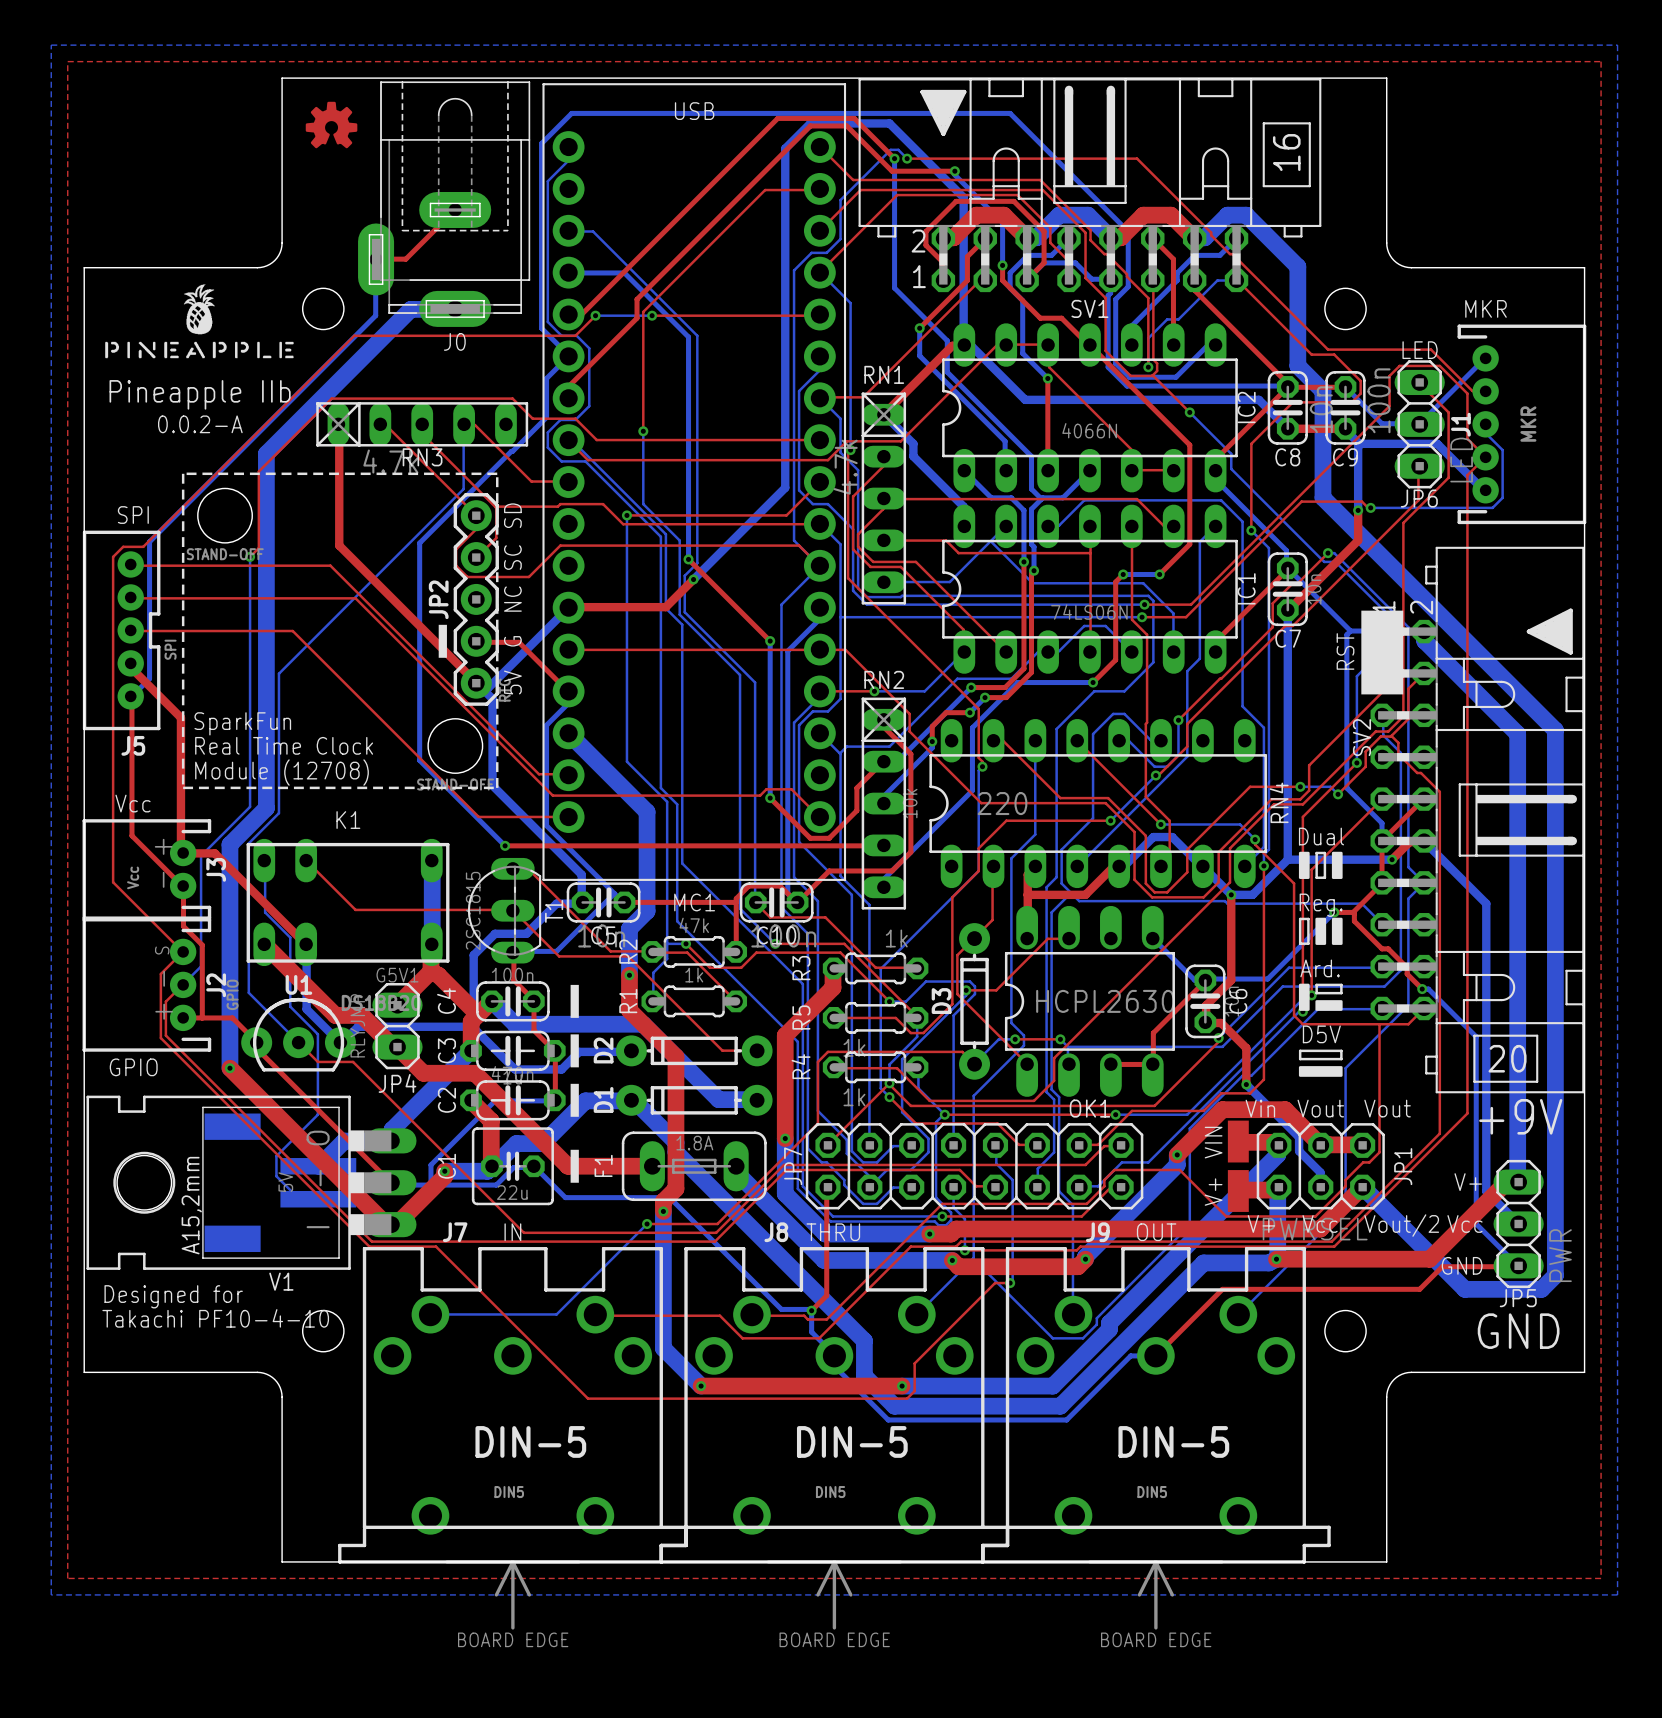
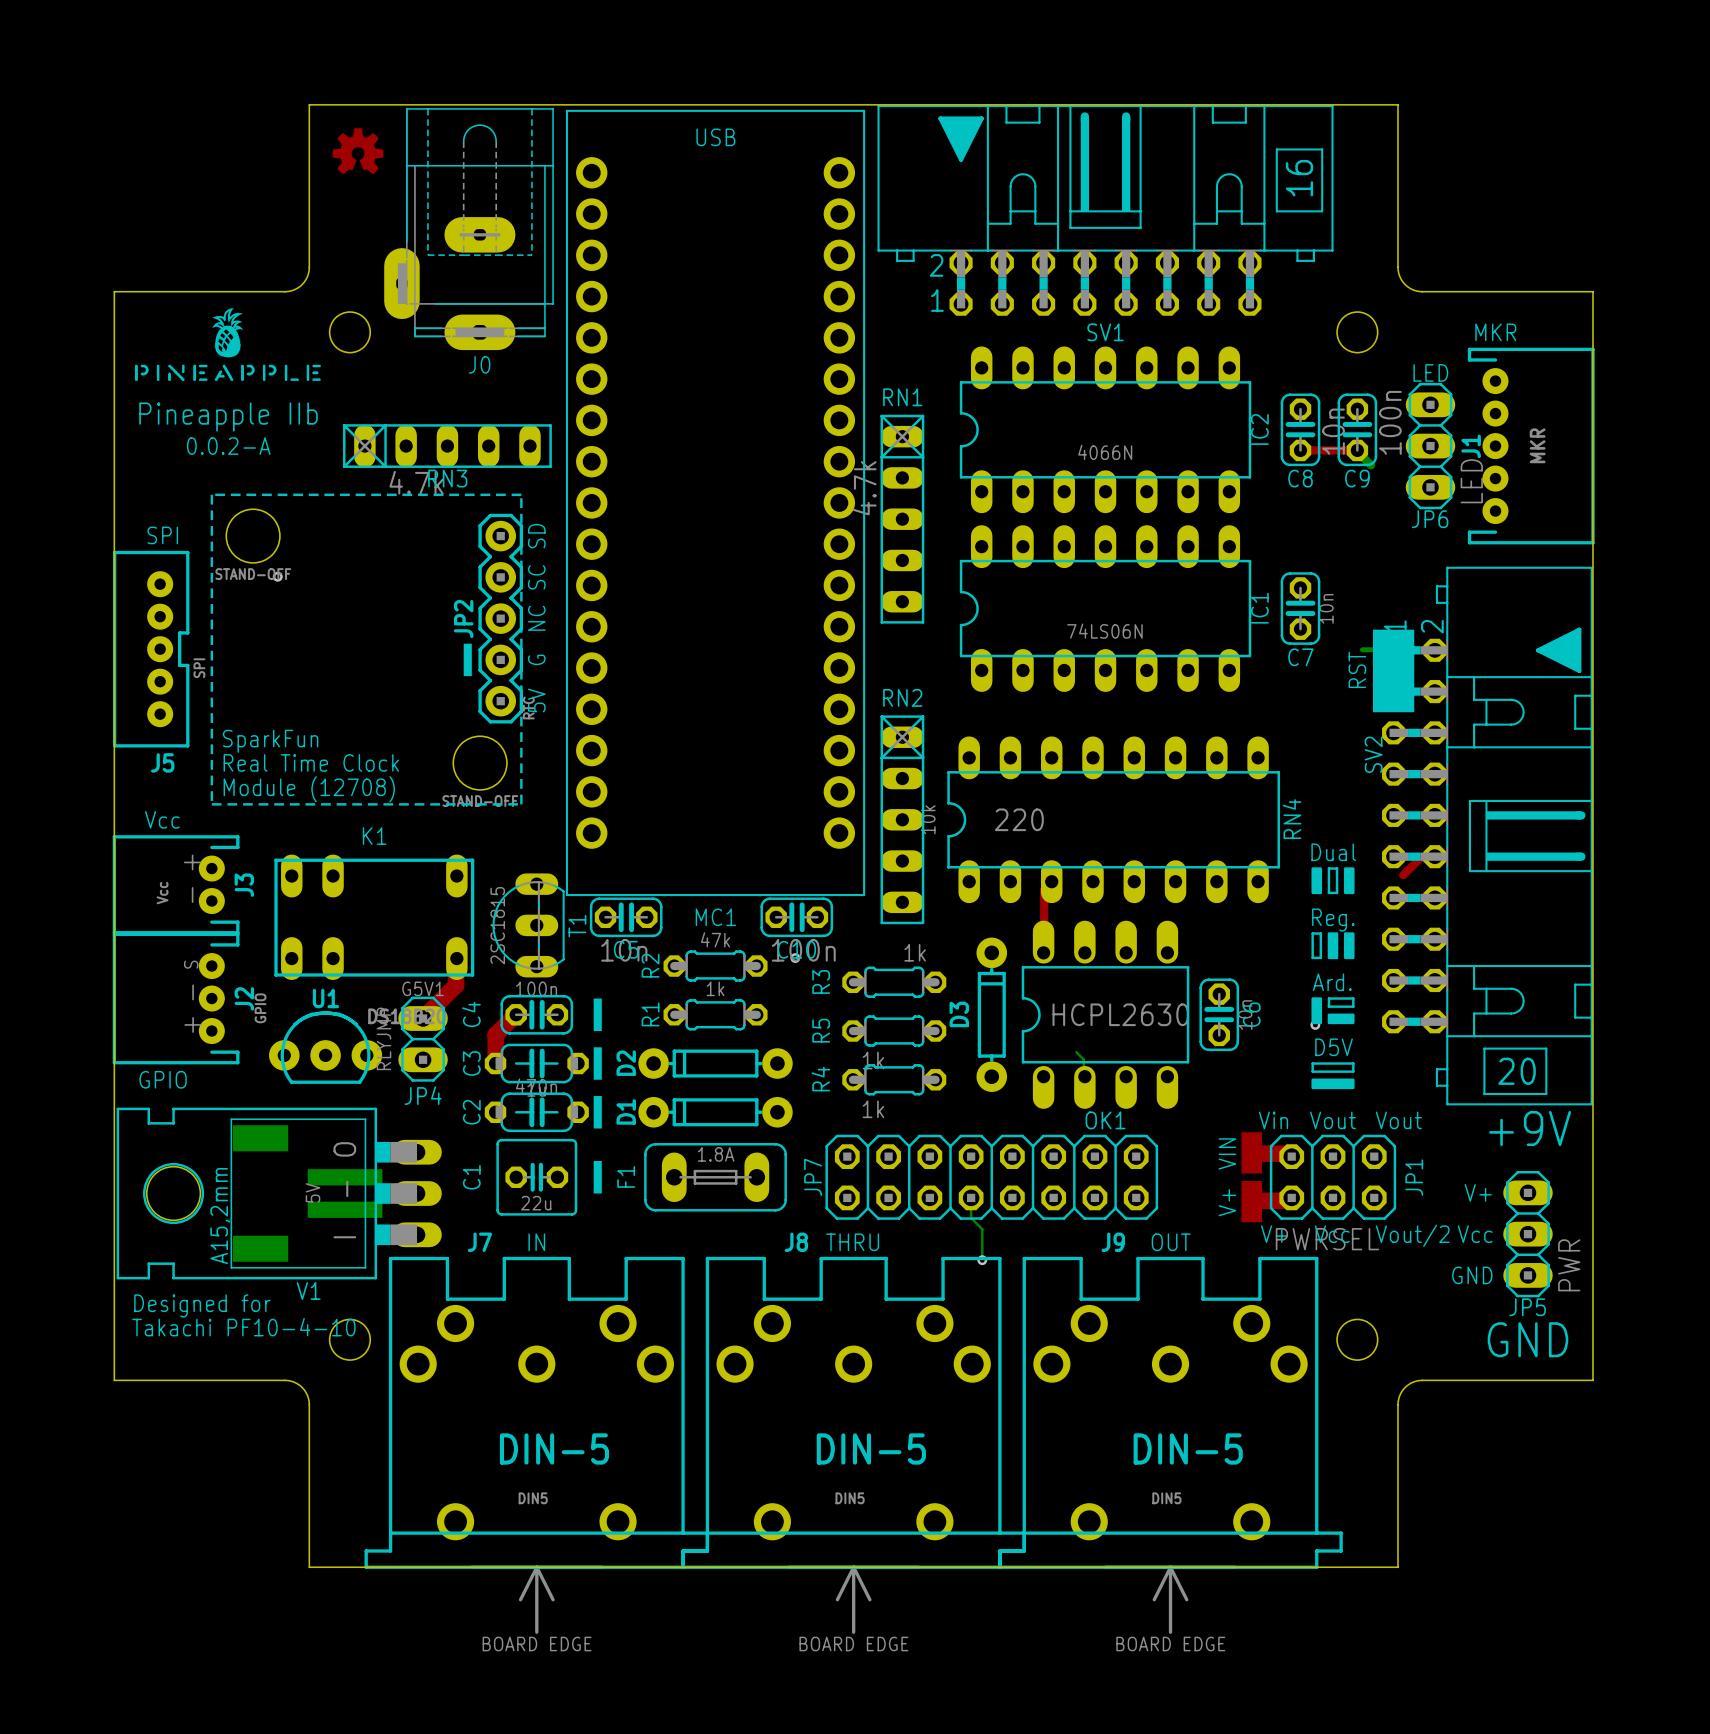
bottom zone outline: (51, 45) (51, 1594) (1617, 1594) (1617, 45) (51, 45) -> none
top zone outline: (67, 61) (67, 1578) (1601, 1578) (1601, 61) (67, 61) -> none
bottom track: (568, 147) (567, 161) (547, 181) (547, 321) (561, 335) (576, 335) (589, 348) (589, 406) (575, 419) (560, 419) (547, 432) (547, 447) (561, 461) (585, 461) (660, 536) (660, 788) (677, 804) (677, 921) (797, 1041) (797, 1188) (830, 1221) (934, 1221) (938, 1225) (946, 1225) (951, 1220) (951, 1212) (936, 1197) (936, 1122) (944, 1114) (918, 1088) (917, 1067) -> none
top track: (819, 147) (853, 180) (1040, 180) (1090, 230) (1090, 240) (1126, 274) (1126, 276) (1148, 298) (1148, 367) -> none
top track: (894, 158) (854, 118) (777, 118) (581, 314) (568, 314) -> none
bottom track: (894, 158) (894, 288) (947, 340) (947, 372) (1031, 456) (1031, 489) (1041, 499) -> none
via: (894, 158) -> none
top track: (907, 158) (1137, 158) (1211, 232) (1211, 235) (1327, 349) (1431, 349) (1472, 391) (1485, 391) -> none
bottom track: (907, 158) (898, 149) (890, 149) (840, 200) (840, 239) (826, 252) (811, 252) (794, 270) (794, 540) (819, 565) (781, 604) (781, 907) (807, 933) (807, 1148) (821, 1162) (826, 1162) (844, 1180) (844, 1185) (863, 1203) (876, 1203) (893, 1187) (911, 1187) -> none
via: (907, 158) -> none
top track: (954, 171) (892, 171) (846, 125) (810, 125) (637, 299) (637, 318) (569, 386) (568, 398) -> none
bottom track: (954, 171) (954, 174) (1002, 222) (1002, 265) -> none
via: (954, 171) -> none
top track: (819, 188) (765, 190) (643, 311) (643, 431) -> none
top track: (455, 210) (405, 259) (376, 259) -> none
bottom track: (568, 230) (593, 231) (697, 335) (697, 563) (684, 575) (684, 612) (755, 682) (755, 902) -> none
top track: (819, 230) (860, 190) (1042, 190) (1085, 232) (1085, 277) (1105, 298) (1105, 350) (1130, 375) (1152, 375) (1157, 370) (1157, 363) (1153, 359) (1152, 280) -> none
top track: (943, 238) (953, 237) (976, 215) (1003, 215) (1027, 238) -> none
top track: (985, 238) (967, 256) (967, 280) (919, 328) -> none
bottom track: (1027, 238) (1036, 237) (1059, 215) (1088, 215) (1110, 238) -> none
bottom track: (1069, 238) (1051, 255) (1027, 255) (1010, 272) (1010, 288) (1022, 300) (1022, 353) (1047, 378) -> none
top track: (1110, 238) (1120, 237) (1143, 215) (1170, 215) (1194, 238) -> none
top track: (1152, 238) (1173, 259) (1173, 345) -> none
bottom track: (1194, 238) (1204, 237) (1227, 215) (1246, 215) (1297, 266) (1297, 365) (1322, 391) (1322, 497) (1555, 730) (1555, 1275) (1541, 1289) (1464, 1289) (1362, 1187) -> none
bottom track: (1236, 238) (1219, 255) (1194, 255) (1177, 272) (1177, 280) (1132, 325) (1131, 345) -> none
bottom track: (376, 259) (375, 315) (149, 541) (149, 678) (130, 696) -> none
top track: (1002, 265) (1002, 280) (1040, 318) (1061, 318) (1189, 445) (1189, 544) (1159, 574) -> none
via: (1002, 265) -> none
bottom track: (568, 272) (624, 272) (688, 337) (688, 559) -> none
top track: (819, 272) (897, 195) (1017, 195) (1050, 227) (1050, 242) (1067, 260) (1069, 280) -> none
bottom track: (819, 272) (850, 303) (850, 450) -> none
top track: (943, 280) (942, 261) (925, 245) (925, 231) (956, 201) (1013, 201) (1044, 231) (1044, 262) (1027, 280) -> none
top track: (985, 280) (979, 280) (863, 397) (819, 398) -> none
bottom track: (1027, 280) (1044, 262) (1075, 262) (1091, 279) (1110, 279) (1110, 293) (1108, 295) (1108, 367) (1126, 386) (1287, 386) -> none
top track: (1194, 280) (1194, 290) (1289, 384) (1287, 386) -> none
top track: (1236, 280) (1311, 354) (1334, 354) (1360, 381) (1360, 393) (1351, 402) (1292, 402) (1251, 443) (1251, 530) -> none
bottom track: (1236, 280) (1217, 280) (1178, 319) (1167, 319) (1148, 338) (1148, 367) -> none
bottom track: (455, 308) (410, 309) (266, 453) (266, 808) (229, 844) (229, 1068) -> none
top track: (819, 314) (652, 315) -> none
top track: (595, 315) (575, 335) (354, 335) (143, 546) (123, 546) (113, 556) (113, 882) (183, 951) (160, 974) (160, 1038) (369, 1246) (436, 1246) (588, 1398) (907, 1398) (914, 1391) (914, 1363) (995, 1283) (1010, 1283) -> none
bottom track: (595, 315) (652, 315) -> none
via: (595, 315) -> none
via: (652, 315) -> none
bottom track: (919, 328) (919, 355) (1005, 441) (1006, 470) -> none
via: (919, 328) -> none
top track: (964, 345) (952, 345) (883, 414) -> none
bottom track: (1215, 345) (1207, 345) (1175, 377) (1129, 377) (1115, 363) (1115, 299) (1128, 286) (1128, 231) (1010, 113) (571, 113) (541, 143) (541, 328) (568, 356) (546, 378) (546, 417) (419, 543) (419, 760) (505, 845) -> none
bottom track: (819, 356) (819, 370) (799, 391) (799, 490) (812, 504) (827, 504) (853, 529) (853, 590) (866, 604) (1144, 604) -> none
bottom track: (1485, 358) (1419, 424) (1382, 423) (1345, 386) -> none
via: (1148, 367) -> none
top track: (1152, 375) (1189, 412) -> none
top track: (1047, 378) (1048, 470) -> none
via: (1047, 378) -> none
top track: (1419, 382) (1448, 412) (1448, 477) (1403, 522) (1403, 716) (1388, 731) (1375, 731) (1302, 804) (1273, 804) (1230, 848) (1230, 882) (1054, 1058) (1054, 1080) (1034, 1100) (929, 1100) (897, 1068) (833, 1067) -> none
top track: (1287, 386) (1216, 458) (1215, 470) -> none
top track: (1287, 386) (1345, 386) -> none
bottom track: (819, 398) (840, 418) (840, 452) (858, 470) (858, 588) (866, 597) (1148, 595) (1153, 600) (1153, 662) (1124, 691) (1094, 691) (1056, 729) (1056, 877) (1046, 887) (1046, 1092) (1054, 1099) (1054, 1152) (1037, 1168) (1037, 1187) -> none
bottom track: (1189, 412) (1231, 453) (1231, 468) (1324, 561) (1335, 561) (1398, 624) (1398, 638) (1389, 647) (1385, 647) (1356, 676) (1356, 762) -> none
via: (1189, 412) -> none
bottom track: (883, 414) (913, 443) (913, 456) (963, 506) (964, 526) -> none
top track: (338, 424) (339, 545) (476, 683) -> none
top track: (380, 424) (385, 424) (476, 515) -> none
top track: (422, 424) (423, 435) (496, 507) (496, 538) (476, 557) -> none
top track: (464, 424) (474, 424) (531, 481) (568, 482) -> none
bottom track: (464, 424) (463, 489) (278, 673) (278, 813) (248, 843) (248, 992) (298, 1042) -> none
bottom track: (1485, 424) (1486, 433) (1502, 450) (1502, 497) (1492, 507) (1370, 507) -> none
bottom track: (1287, 428) (1258, 399) (1025, 399) (971, 345) (964, 345) (963, 197) (889, 123) (810, 123) (785, 148) (785, 487) (693, 579) -> none
bottom track: (643, 431) (643, 504) (679, 540) (679, 614) (740, 674) (740, 908) (775, 943) -> none
via: (643, 431) -> none
top track: (568, 440) (588, 460) (827, 460) (846, 441) (900, 441) (996, 345) (1047, 344) (1049, 367) (1132, 450) (1131, 470) (1173, 470) -> none
bottom track: (568, 440) (572, 441) (665, 534) (665, 608) (682, 624) (682, 863) (802, 984) (802, 1186) (833, 1216) (942, 1216) -> none
top track: (819, 440) (596, 440) (575, 418) (532, 418) (512, 398) (331, 398) (258, 471) (258, 548) (250, 556) -> none
top track: (850, 450) (848, 452) (848, 578) (978, 708) (978, 757) (982, 761) (982, 766) -> none
via: (850, 450) -> none
top track: (883, 456) (883, 466) (853, 496) (853, 549) (870, 566) (900, 566) (963, 629) (964, 652) -> none
top track: (1419, 466) (1418, 500) (1292, 625) (1285, 625) (1187, 723) (1187, 746) (1158, 775) (1155, 775) -> none
bottom track: (964, 470) (991, 497) (1011, 497) (1023, 510) (1023, 561) -> none
bottom track: (1089, 470) (1062, 497) (1042, 497) (1031, 509) (1034, 570) -> none
bottom track: (1215, 470) (1216, 480) (1286, 550) (1286, 566) (1350, 631) (1346, 634) (1346, 788) (1382, 823) (1382, 840) -> none
top track: (819, 482) (786, 515) (626, 515) -> none
bottom track: (1485, 490) (1437, 443) (1359, 443) (1358, 510) -> none
top track: (495, 507) (603, 504) (623, 524) (819, 523) -> none
top track: (1370, 507) (1361, 501) (1301, 501) (1186, 617) (1142, 617) -> none
via: (1370, 507) -> none
top track: (1358, 510) (1358, 540) (1287, 610) -> none
via: (1358, 510) -> none
top track: (476, 515) (476, 529) (456, 549) (456, 565) (467, 577) (528, 577) (560, 545) (799, 545) (819, 565) -> none
bottom track: (626, 515) (626, 761) (667, 801) (667, 958) (653, 972) (652, 1001) -> none
via: (626, 515) -> none
bottom track: (819, 523) (840, 544) (840, 698) (827, 711) (812, 711) (799, 725) (799, 842) (851, 894) (851, 1151) (863, 1162) (876, 1162) (893, 1146) (911, 1145) -> none
bottom track: (1006, 526) (949, 582) (883, 582) -> none
bottom track: (1048, 526) (1059, 525) (1084, 500) (1221, 500) (1242, 521) (1242, 706) (1263, 727) (1263, 847) (1244, 866) -> none
top track: (1089, 526) (1089, 652) -> none
top track: (1131, 526) (1132, 619) (1147, 634) (1145, 796) (1169, 820) (1169, 858) (1161, 866) -> none
top track: (1173, 526) (1163, 525) (1137, 499) (883, 498) (883, 509) (858, 534) (858, 546) (873, 561) (915, 561) (1006, 652) -> none
bottom track: (1215, 526) (1199, 541) (1199, 658) (1187, 671) (1187, 756) (1077, 866) -> none
bottom track: (1251, 530) (1268, 548) (1268, 849) (1263, 854) (1263, 865) -> none
via: (1251, 530) -> none
top track: (883, 540) (946, 540) (958, 553) (1090, 553) -> none
bottom track: (990, 541) (1032, 583) (1143, 583) (1173, 613) (1173, 652) -> none
top track: (1327, 553) (1297, 583) (1292, 583) (1272, 603) (1272, 627) (1178, 720) -> none
bottom track: (1327, 553) (1334, 553) (1408, 627) (1408, 867) (1424, 882) (1408, 898) (1408, 1005) (1345, 1068) (1345, 1207) (1238, 1314) -> none
via: (1327, 553) -> none
bottom track: (250, 556) (250, 806) (201, 855) (201, 966) (183, 984) -> none
top track: (688, 559) (770, 641) -> none
via: (688, 559) -> none
top track: (1023, 561) (1023, 668) (1005, 687) (971, 687) -> none
via: (1023, 561) -> none
top track: (130, 564) (330, 565) (539, 774) (568, 775) -> none
top track: (1287, 568) (1216, 641) (1215, 652) -> none
top track: (1034, 570) (1031, 573) (1031, 672) (1006, 697) (985, 697) -> none
via: (1034, 570) -> none
top track: (1123, 574) (1115, 582) (1115, 659) (1093, 682) -> none
bottom track: (1123, 574) (1159, 574) -> none
via: (1123, 574) -> none
via: (1159, 574) -> none
top track: (693, 579) (665, 607) (568, 607) -> none
via: (693, 579) -> none
top track: (130, 597) (355, 598) (552, 795) (760, 795) (766, 789) (791, 789) (819, 817) -> none
top track: (1144, 604) (1191, 604) (1389, 406) (1389, 375) (1399, 365) (1439, 365) (1467, 393) (1467, 438) (1485, 457) (1467, 475) (1467, 1113) (1334, 1246) (1080, 1246) (1076, 1250) (964, 1250) -> none
via: (1144, 604) -> none
bottom track: (568, 607) (487, 688) (476, 683) (492, 698) (492, 785) (581, 874) (582, 902) (556, 903) (526, 933) (495, 933) (473, 955) (472, 1026) -> none
bottom track: (819, 607) (819, 619) (787, 651) (787, 893) (797, 902) -> none
bottom track: (1287, 610) (1287, 859) -> none
bottom track: (840, 617) (1142, 617) -> none
via: (1142, 617) -> none
top track: (130, 630) (292, 631) (478, 816) (568, 817) -> none
bottom track: (1424, 631) (1424, 641) (1517, 734) (1518, 1182) -> none
top track: (476, 641) (518, 642) (568, 691) -> none
bottom track: (770, 641) (770, 798) -> none
via: (770, 641) -> none
top track: (568, 649) (845, 649) (909, 713) (909, 731) (981, 803) (1105, 803) (1134, 832) (1134, 879) (1152, 897) (1203, 897) (1218, 882) (1218, 852) (1271, 799) (1300, 799) (1309, 790) (1309, 765) (1382, 692) (1382, 673) -> none
bottom track: (964, 652) (924, 691) (874, 691) -> none
bottom track: (1131, 652) (1105, 625) (1084, 625) (1059, 651) (1037, 652) (1011, 678) (957, 678) (889, 746) (846, 746) (839, 753) -> none
top track: (130, 663) (131, 668) (180, 717) (180, 849) (183, 853) (214, 853) (306, 944) -> none
top track: (1424, 673) (1408, 688) (1408, 718) (1390, 736) (1380, 736) (1365, 751) (1365, 766) (1338, 794) -> none
bottom track: (1093, 682) (1017, 682) (972, 727) (972, 790) (884, 878) (883, 887) -> none
via: (1093, 682) -> none
bottom track: (971, 687) (898, 760) (883, 761) -> none
via: (971, 687) -> none
bottom track: (568, 691) (567, 703) (546, 725) (546, 825) (624, 902) -> none
bottom track: (819, 691) (819, 697) (794, 722) (794, 877) (817, 901) (817, 1110) (846, 1139) (846, 1153) (874, 1181) (869, 1187) (887, 1169) (910, 1169) (928, 1152) (928, 1138) (902, 1112) (902, 1059) (966, 995) (966, 990) -> none
top track: (874, 691) (819, 691) -> none
via: (874, 691) -> none
top track: (130, 696) (131, 835) (183, 886) (183, 926) (202, 945) (202, 1017) -> none
bottom track: (985, 697) (969, 712) -> none
via: (985, 697) -> none
top track: (969, 712) (946, 712) (932, 726) (932, 741) -> none
via: (969, 712) -> none
bottom track: (1382, 715) (1383, 735) (1400, 752) (1400, 970) (1384, 986) (1282, 986) (1222, 1046) (1067, 1046) -> none
top track: (883, 719) (884, 727) (910, 754) (910, 852) (892, 870) (829, 870) (797, 902) (780, 886) (748, 886) (736, 898) (736, 951) -> none
bottom track: (1178, 720) (1178, 755) (1167, 766) (1154, 766) (1129, 741) (1119, 740) -> none
via: (1178, 720) -> none
bottom track: (568, 733) (647, 811) (647, 911) (629, 928) (629, 975) -> none
bottom track: (819, 733) (840, 754) (840, 876) (869, 904) (869, 1145) -> none
top track: (1391, 735) (1398, 742) (1398, 754) (1439, 791) (1439, 1133) (1331, 1241) (961, 1241) (956, 1246) (910, 1246) (819, 1338) (742, 1338) (719, 1315) (595, 1314) -> none
top track: (993, 740) (1003, 741) (1060, 798) (1108, 798) (1145, 835) (1145, 883) (1154, 892) (1167, 892) (1187, 872) (1187, 849) (1250, 786) (1300, 786) -> none
bottom track: (1035, 740) (1035, 834) (1011, 858) (1011, 1022) (1023, 1035) (1023, 1045) (973, 1095) (973, 1257) (916, 1314) -> none
top track: (1077, 740) (1160, 824) -> none
bottom track: (1161, 740) (1150, 740) (1124, 713) (1113, 713) (1093, 734) (1093, 818) (1061, 849) (1061, 883) (1079, 901) (1361, 903) (1382, 924) -> none
bottom track: (932, 741) (932, 747) (884, 795) (883, 803) -> none
via: (932, 741) -> none
top track: (883, 761) (856, 788) (856, 810) (829, 838) (810, 838) (770, 798) -> none
top track: (1356, 762) (1302, 816) (1302, 1011) -> none
via: (1356, 762) -> none
bottom track: (982, 766) (978, 770) (978, 870) (880, 968) (880, 1088) (889, 1097) -> none
via: (982, 766) -> none
bottom track: (1155, 775) (1110, 820) -> none
via: (1155, 775) -> none
bottom track: (1300, 786) (1330, 786) (1338, 794) -> none
via: (1300, 786) -> none
via: (1338, 794) -> none
via: (770, 798) -> none
top track: (1382, 799) (1311, 869) (1311, 995) -> none
top track: (1424, 799) (1382, 840) (1382, 882) (1353, 912) -> none
top track: (1110, 820) (1006, 820) (978, 848) (978, 870) (952, 897) (952, 1004) (923, 1033) (910, 1033) (895, 1017) (833, 1017) -> none
via: (1110, 820) -> none
bottom track: (1160, 824) (1240, 824) (1255, 839) -> none
via: (1160, 824) -> none
top track: (1255, 839) (1255, 844) (1294, 883) (1294, 1015) (1302, 1024) (1408, 1024) (1424, 1008) -> none
via: (1255, 839) -> none
bottom track: (1424, 840) (1486, 903) (1486, 1191) (1518, 1223) -> none
via: (505, 845) -> none
top track: (883, 845) (505, 845) -> none
bottom track: (1287, 859) (1252, 894) (1231, 894) (1172, 837) (1153, 837) (1124, 865) (1119, 866) -> none
bottom track: (1287, 859) (1392, 859) -> none
via: (1392, 859) -> none
bottom track: (264, 860) (265, 912) (290, 937) (290, 1006) (317, 1034) (317, 1114) (276, 1156) (276, 1176) (299, 1198) (318, 1199) -> none
top track: (306, 860) (355, 909) (512, 909) (559, 956) (628, 956) (722, 1050) (757, 1050) -> none
bottom track: (431, 860) (431, 944) -> none
top track: (1263, 865) (1263, 1079) (1250, 1093) (1221, 1093) (1203, 1110) (1132, 1110) (1098, 1144) (1079, 1145) -> none
via: (1263, 865) -> none
top track: (993, 866) (992, 919) (957, 955) (957, 994) (1027, 1064) -> none
top track: (1119, 866) (1113, 867) (1085, 894) (1027, 894) -> none
top track: (512, 868) (528, 869) (610, 951) (687, 952) (736, 1001) -> none
bottom track: (1071, 892) (1051, 912) (1051, 1089) (1059, 1097) (1059, 1191) (1072, 1205) (1073, 1314) -> none
bottom track: (614, 893) (556, 951) (512, 952) -> none
top track: (1231, 894) (1231, 980) (1206, 1005) (1205, 1022) (1221, 1022) (1246, 1048) (1246, 1084) -> none
via: (1231, 894) -> none
top track: (736, 902) (624, 902) -> none
top track: (755, 902) (770, 917) (825, 917) (875, 967) (917, 968) -> none
top track: (1334, 912) (1353, 912) -> none
bottom track: (1334, 912) (1267, 979) (1194, 980) (1152, 938) -> none
via: (1334, 912) -> none
top track: (1353, 912) (1354, 921) (1382, 948) (1388, 948) (1407, 967) (1407, 974) (1422, 989) -> none
top track: (1069, 938) (1047, 938) (996, 990) (966, 990) -> none
bottom track: (667, 943) (686, 943) -> none
top track: (686, 943) (709, 967) (741, 967) (756, 952) (840, 952) (889, 1001) -> none
via: (686, 943) -> none
top track: (775, 943) (844, 943) (917, 1017) -> none
top track: (264, 944) (335, 1015) (361, 1015) (423, 1073) (474, 1073) (567, 1166) (652, 1166) -> none
bottom track: (306, 944) (306, 1009) (340, 1042) (358, 1026) (472, 1026) -> none
top track: (512, 952) (513, 980) (533, 1001) -> none
bottom track: (1382, 966) (1289, 967) (1218, 1038) -> none
top track: (833, 968) (833, 987) (785, 1035) (785, 1138) -> none
top track: (430, 971) (438, 975) (478, 1014) -> none
top track: (629, 975) (629, 1010) (675, 1056) (675, 1188) (663, 1201) (663, 1211) -> none
via: (629, 975) -> none
top track: (1205, 980) (1153, 1033) (1152, 1064) (1110, 1064) -> none
top track: (183, 984) (165, 1001) (165, 1035) (371, 1241) (714, 1241) (786, 1169) (959, 1169) (976, 1186) (995, 1187) -> none
bottom track: (1422, 989) (1428, 989) (1476, 1036) (1476, 1224) (1518, 1265) -> none
via: (1422, 989) -> none
via: (966, 990) -> none
bottom track: (1311, 995) (1306, 995) (1187, 1114) (1115, 1114) -> none
via: (1311, 995) -> none
bottom track: (491, 1001) (515, 1024) (643, 1024) (718, 1099) (757, 1100) -> none
top track: (533, 1001) (533, 1030) (555, 1051) (554, 1100) -> none
bottom track: (889, 1001) (905, 1001) (925, 981) (969, 981) (974, 986) (974, 994) (953, 1015) (953, 1145) -> none
via: (889, 1001) -> none
bottom track: (1382, 1008) (1317, 1009) (1251, 1075) (1242, 1075) (1189, 1128) (1189, 1225) (1096, 1318) (1096, 1324) (1083, 1338) (1052, 1338) (973, 1258) -> none
bottom track: (1302, 1011) (1299, 1011) (1148, 1162) (1121, 1162) (1098, 1186) (1079, 1187) -> none
top track: (183, 1017) (232, 1017) (256, 1041) (257, 1049) (391, 1182) -> none
bottom track: (917, 1017) (917, 1036) (889, 1064) (889, 1083) -> none
top track: (1379, 1024) (1379, 1152) (1369, 1162) (1363, 1162) (1345, 1180) (1345, 1186) (1315, 1216) (1226, 1216) (1179, 1169) (1114, 1169) (1104, 1180) (1104, 1186) (1086, 1203) (942, 1203) (826, 1319) (807, 1319) (804, 1315) (751, 1314) -> none
bottom track: (472, 1026) (515, 1069) (561, 1069) (579, 1051) (631, 1050) -> none
top track: (1218, 1038) (1218, 1041) (1154, 1105) (910, 1105) (889, 1083) (827, 1145) -> none
via: (1218, 1038) -> none
top track: (1015, 1039) (1060, 1039) -> none
bottom track: (1015, 1039) (998, 1039) (974, 1064) -> none
via: (1015, 1039) -> none
via: (1060, 1039) -> none
top track: (298, 1042) (317, 1061) (353, 1061) (523, 1232) (716, 1232) (784, 1164) (1085, 1164) (1104, 1146) (1121, 1145) -> none
bottom track: (471, 1050) (392, 1129) (391, 1140) (344, 1141) (318, 1166) -> none
top track: (974, 1064) (962, 1051) (827, 1051) (817, 1061) (817, 1123) (717, 1224) (647, 1224) -> none
top track: (229, 1068) (383, 1221) (391, 1224) (397, 1224) (444, 1176) (444, 1171) -> none
via: (229, 1068) -> none
via: (889, 1083) -> none
bottom track: (1246, 1084) (1299, 1137) (1299, 1151) (1320, 1172) (1320, 1187) -> none
via: (1246, 1084) -> none
top track: (889, 1097) (915, 1123) (997, 1123) (1018, 1144) (1037, 1145) -> none
via: (889, 1097) -> none
top track: (471, 1100) (491, 1120) (491, 1166) -> none
bottom track: (554, 1100) (495, 1100) (430, 1164) (430, 1185) -> none
top track: (944, 1114) (1115, 1114) -> none
via: (944, 1114) -> none
via: (1115, 1114) -> none
bottom track: (785, 1138) (785, 1193) (825, 1234) (929, 1234) -> none
via: (785, 1138) -> none
bottom track: (995, 1145) (996, 1163) (1012, 1180) (1012, 1280) (1010, 1283) -> none
bottom track: (1278, 1145) (1277, 1154) (1109, 1323) (1109, 1329) (1052, 1386) (902, 1386) -> none
top track: (1362, 1145) (1320, 1145) (1285, 1109) (1222, 1109) (1177, 1154) -> none
bottom track: (1177, 1154) (1177, 1164) (1085, 1256) (1085, 1259) -> none
via: (1177, 1154) -> none
bottom track: (736, 1166) (736, 1172) (824, 1260) (952, 1260) -> none
bottom track: (444, 1171) (487, 1171) (516, 1143) (542, 1143) (585, 1100) (631, 1100) (638, 1104) (675, 1142) (675, 1152) (864, 1340) (864, 1376) (894, 1406) (1060, 1406) (1203, 1262) (1268, 1262) (1277, 1257) (1278, 1187) -> none
via: (444, 1171) -> none
bottom track: (391, 1182) (393, 1185) (496, 1185) (513, 1167) (533, 1166) (565, 1197) (669, 1197) (781, 1309) (811, 1310) (811, 1332) (834, 1354) (835, 1367) (888, 1420) (1066, 1420) (1130, 1355) (1155, 1355) -> none
top track: (1518, 1182) (1506, 1182) (1429, 1259) (1276, 1259) -> none
top track: (827, 1187) (826, 1295) (811, 1310) -> none
top track: (1121, 1187) (1110, 1187) (1081, 1216) (942, 1216) -> none
top track: (1362, 1187) (1320, 1229) (956, 1229) (951, 1234) (929, 1234) -> none
bottom track: (663, 1211) (663, 1348) (701, 1386) -> none
via: (663, 1211) -> none
via: (942, 1216) -> none
bottom track: (647, 1224) (556, 1314) (430, 1314) -> none
via: (647, 1224) -> none
via: (929, 1234) -> none
top track: (1085, 1259) (1077, 1266) (958, 1266) (952, 1260) -> none
via: (1085, 1259) -> none
via: (1276, 1259) -> none
via: (952, 1260) -> none
top track: (1518, 1265) (1442, 1266) (1419, 1289) (1222, 1289) (1155, 1355) -> none
via: (1010, 1283) -> none
via: (811, 1310) -> none
top track: (701, 1386) (902, 1386) -> none
via: (701, 1386) -> none
via: (902, 1386) -> none

